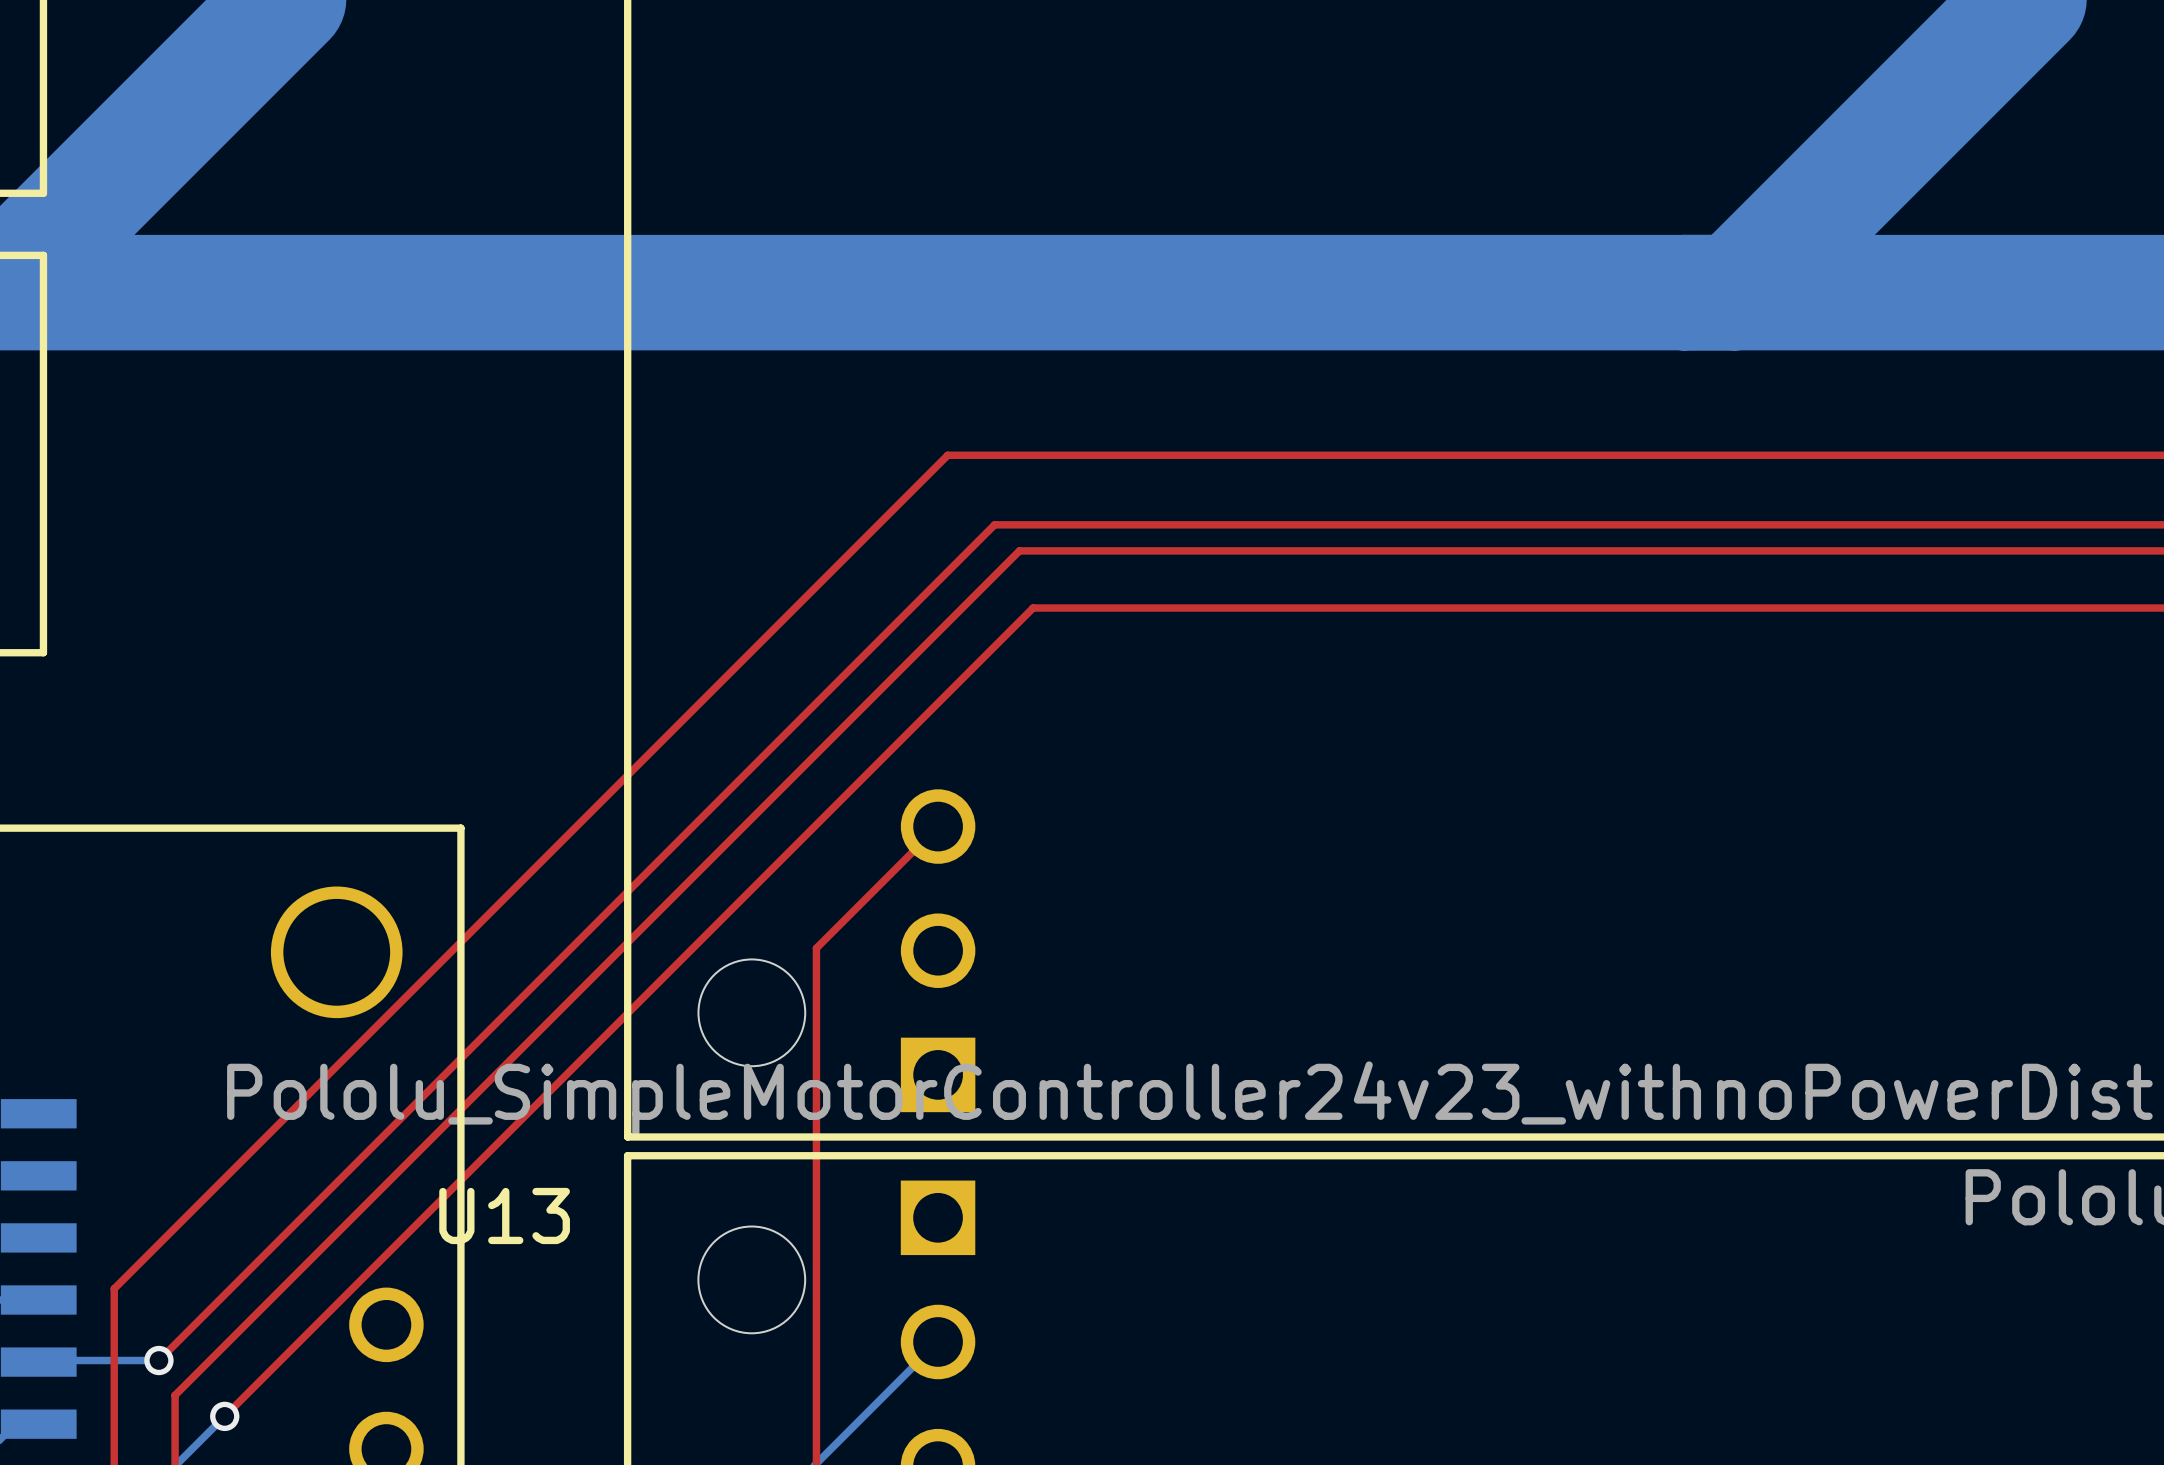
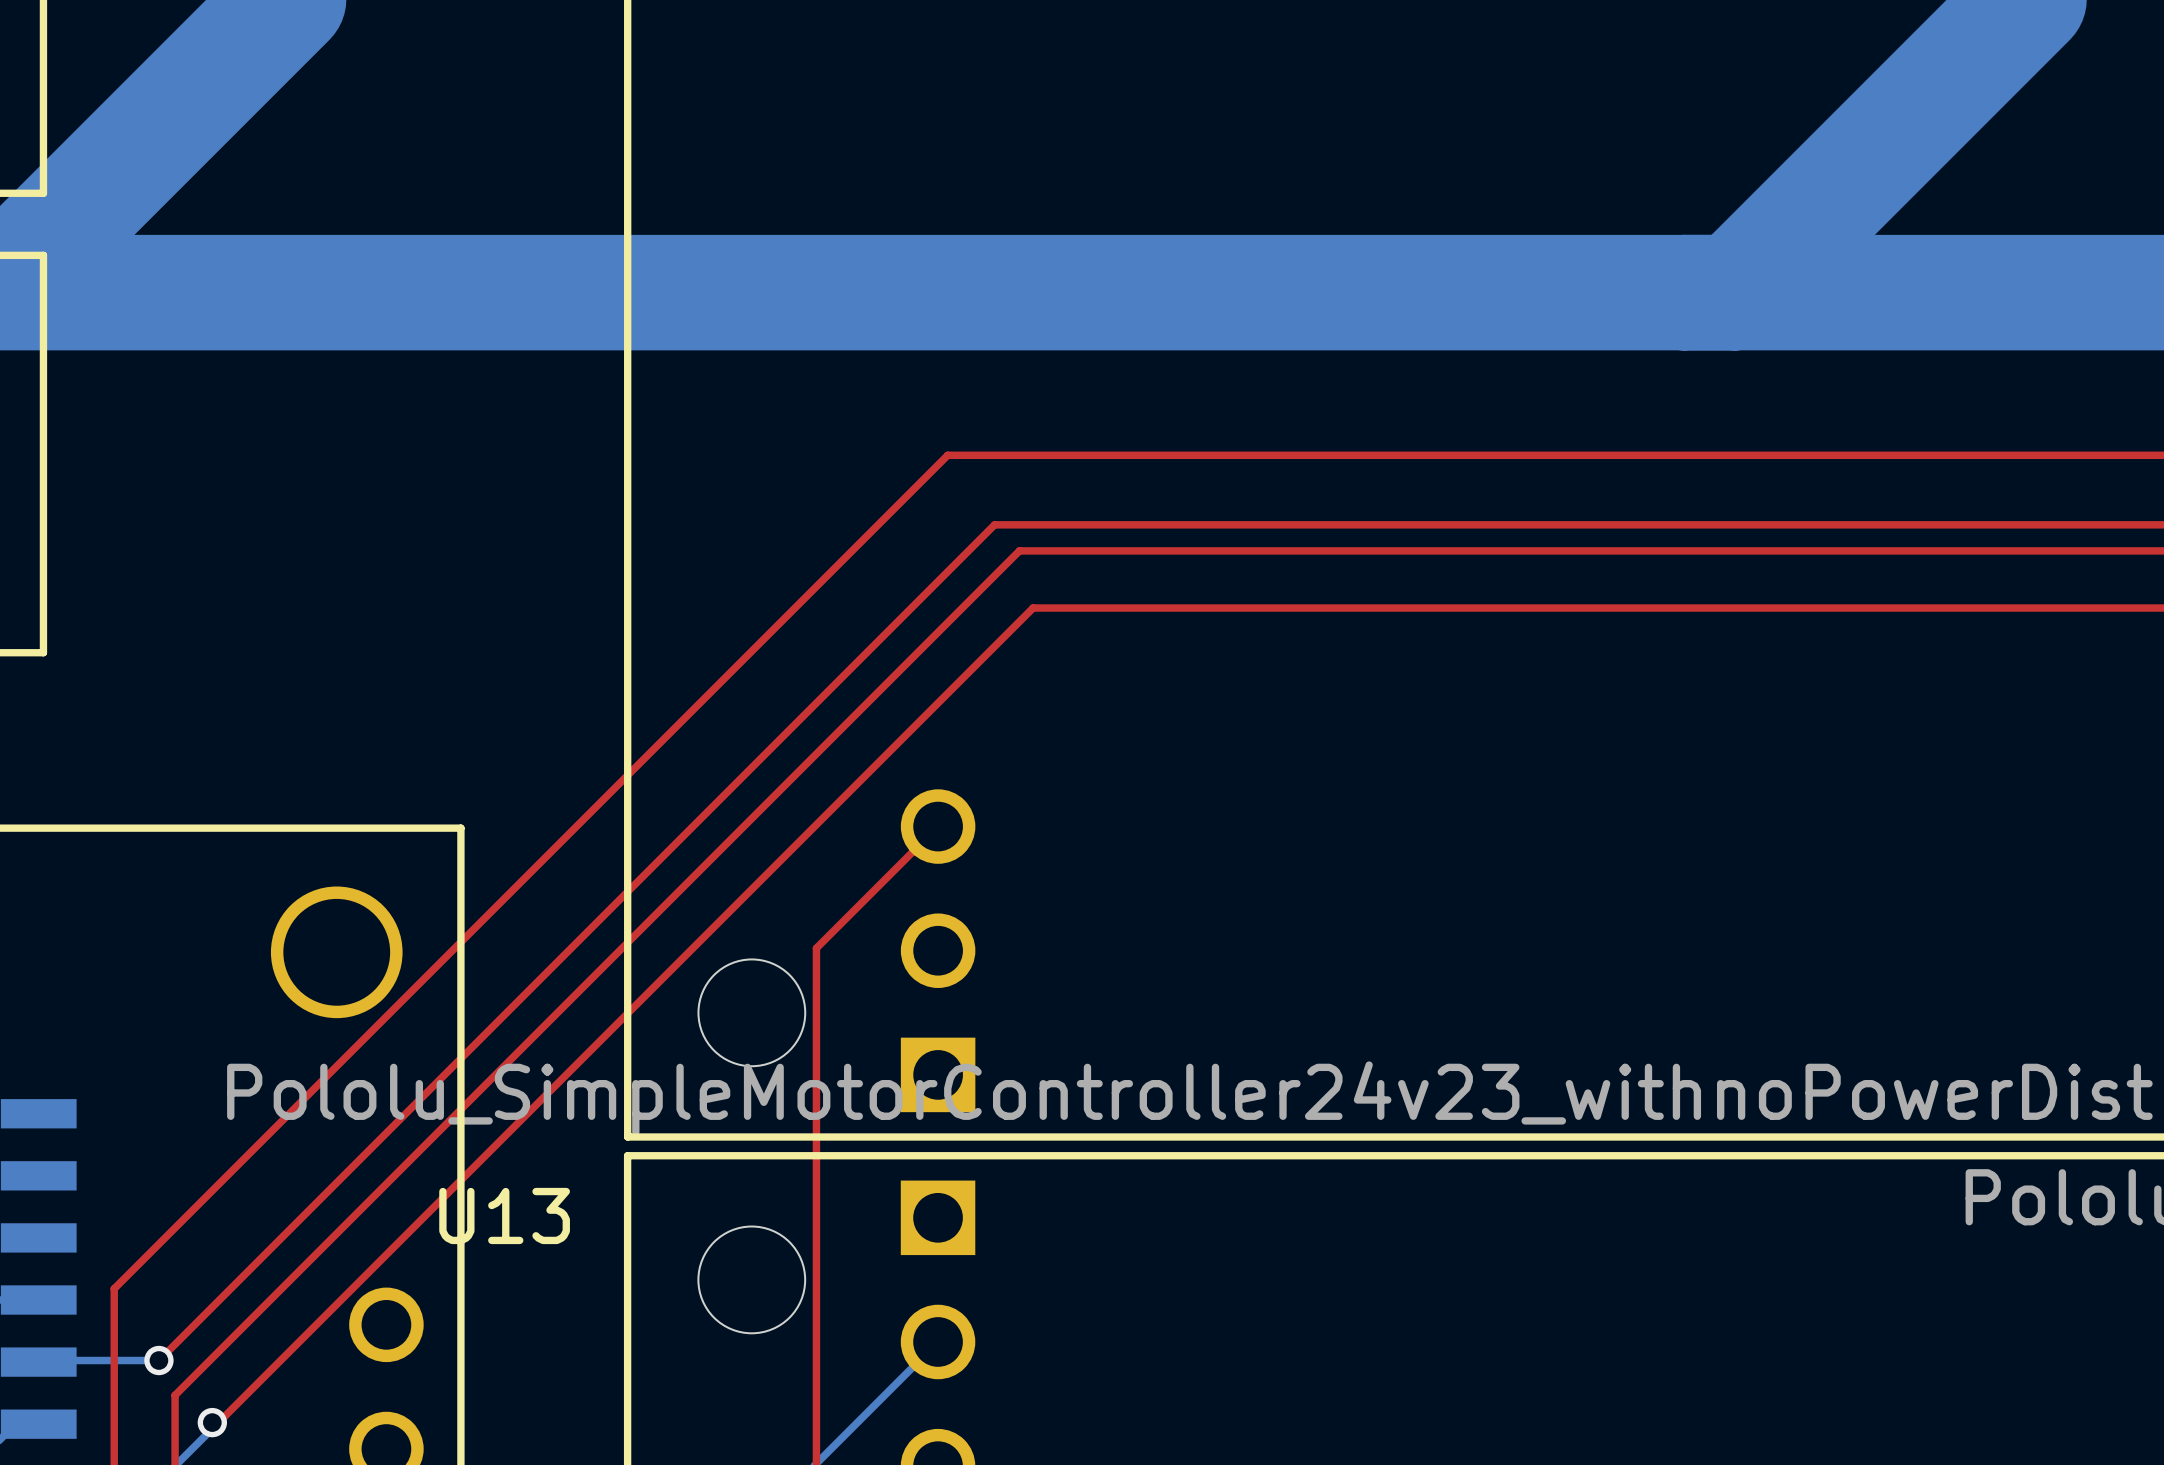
via position: (224, 1416) -> (212, 1422)

